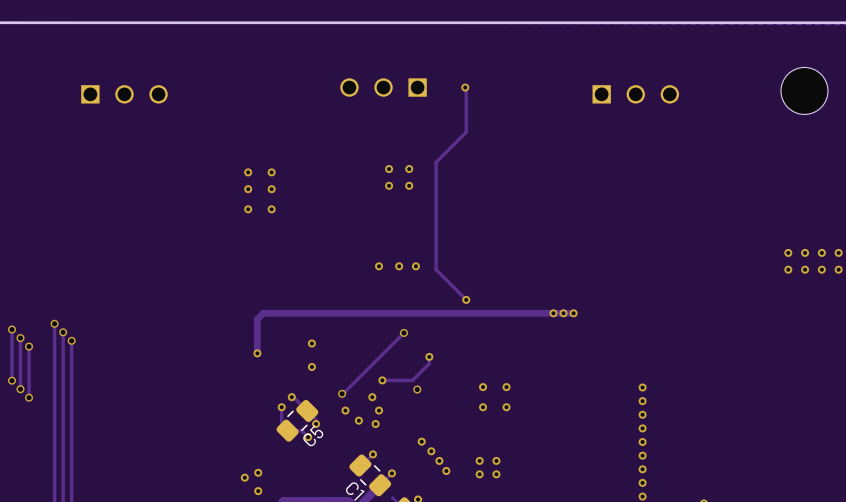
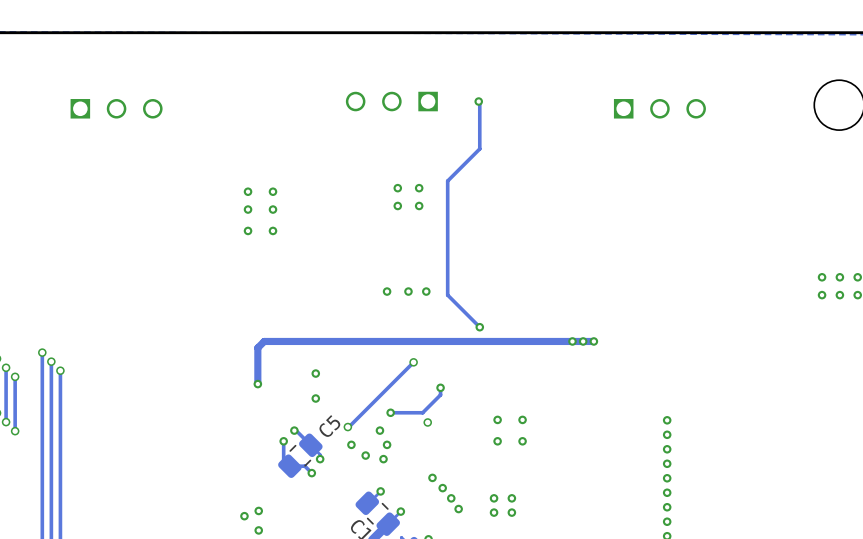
C5 name position: C5 (313, 435) -> C5 (329, 426)

